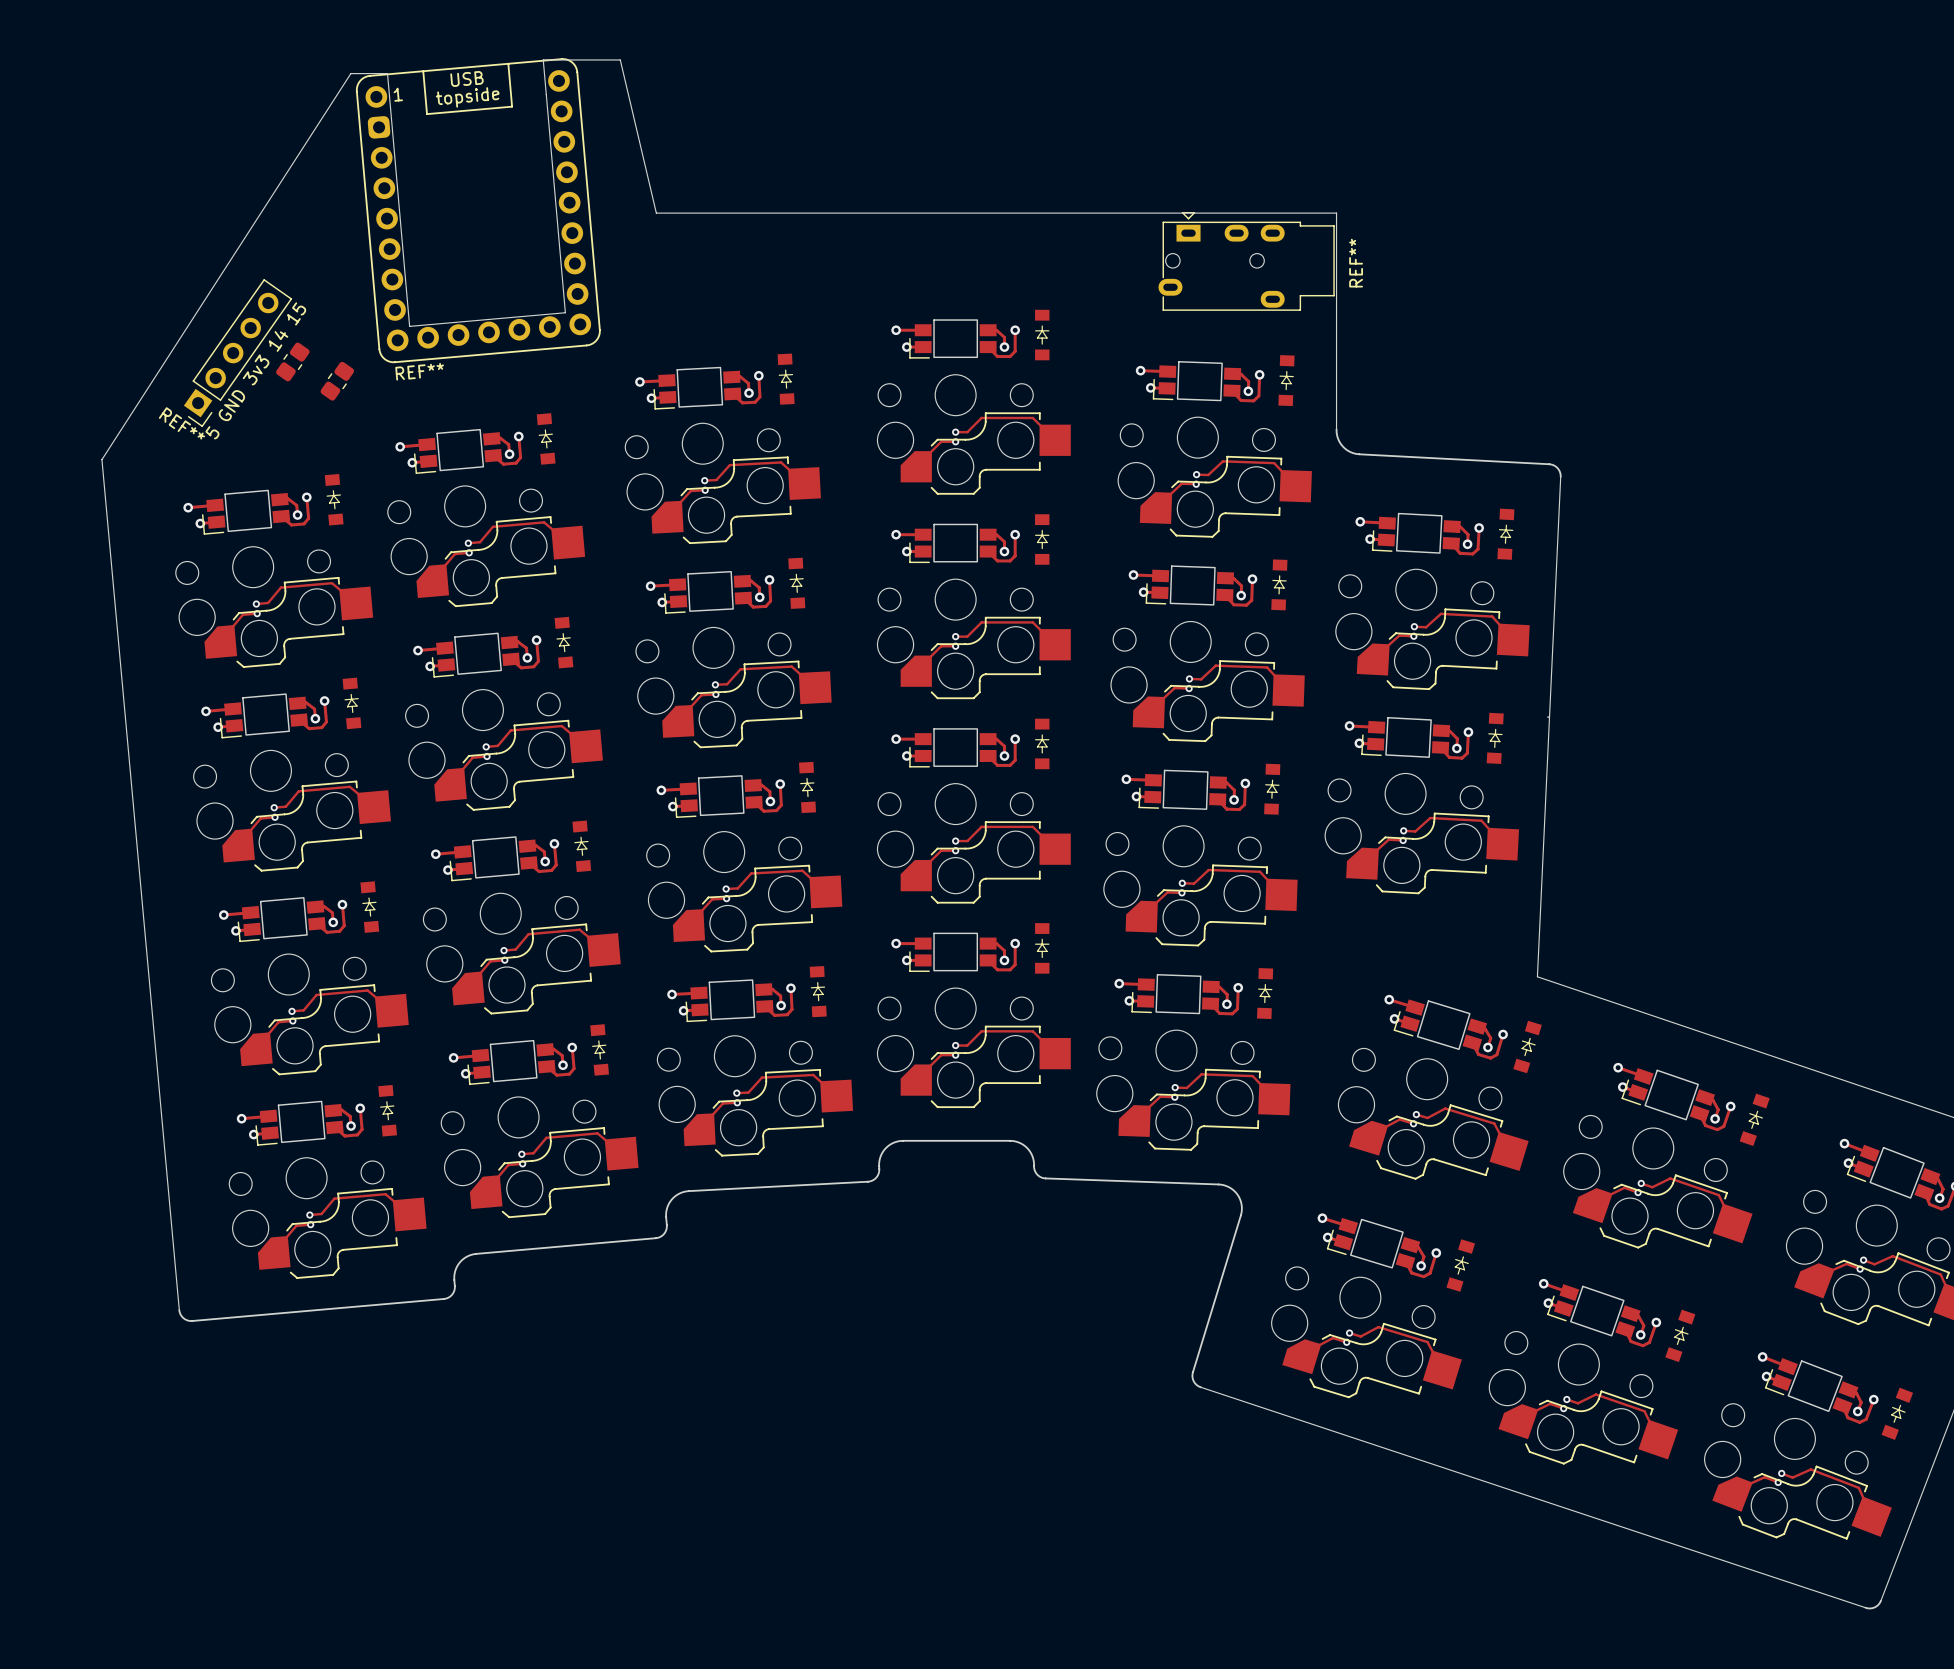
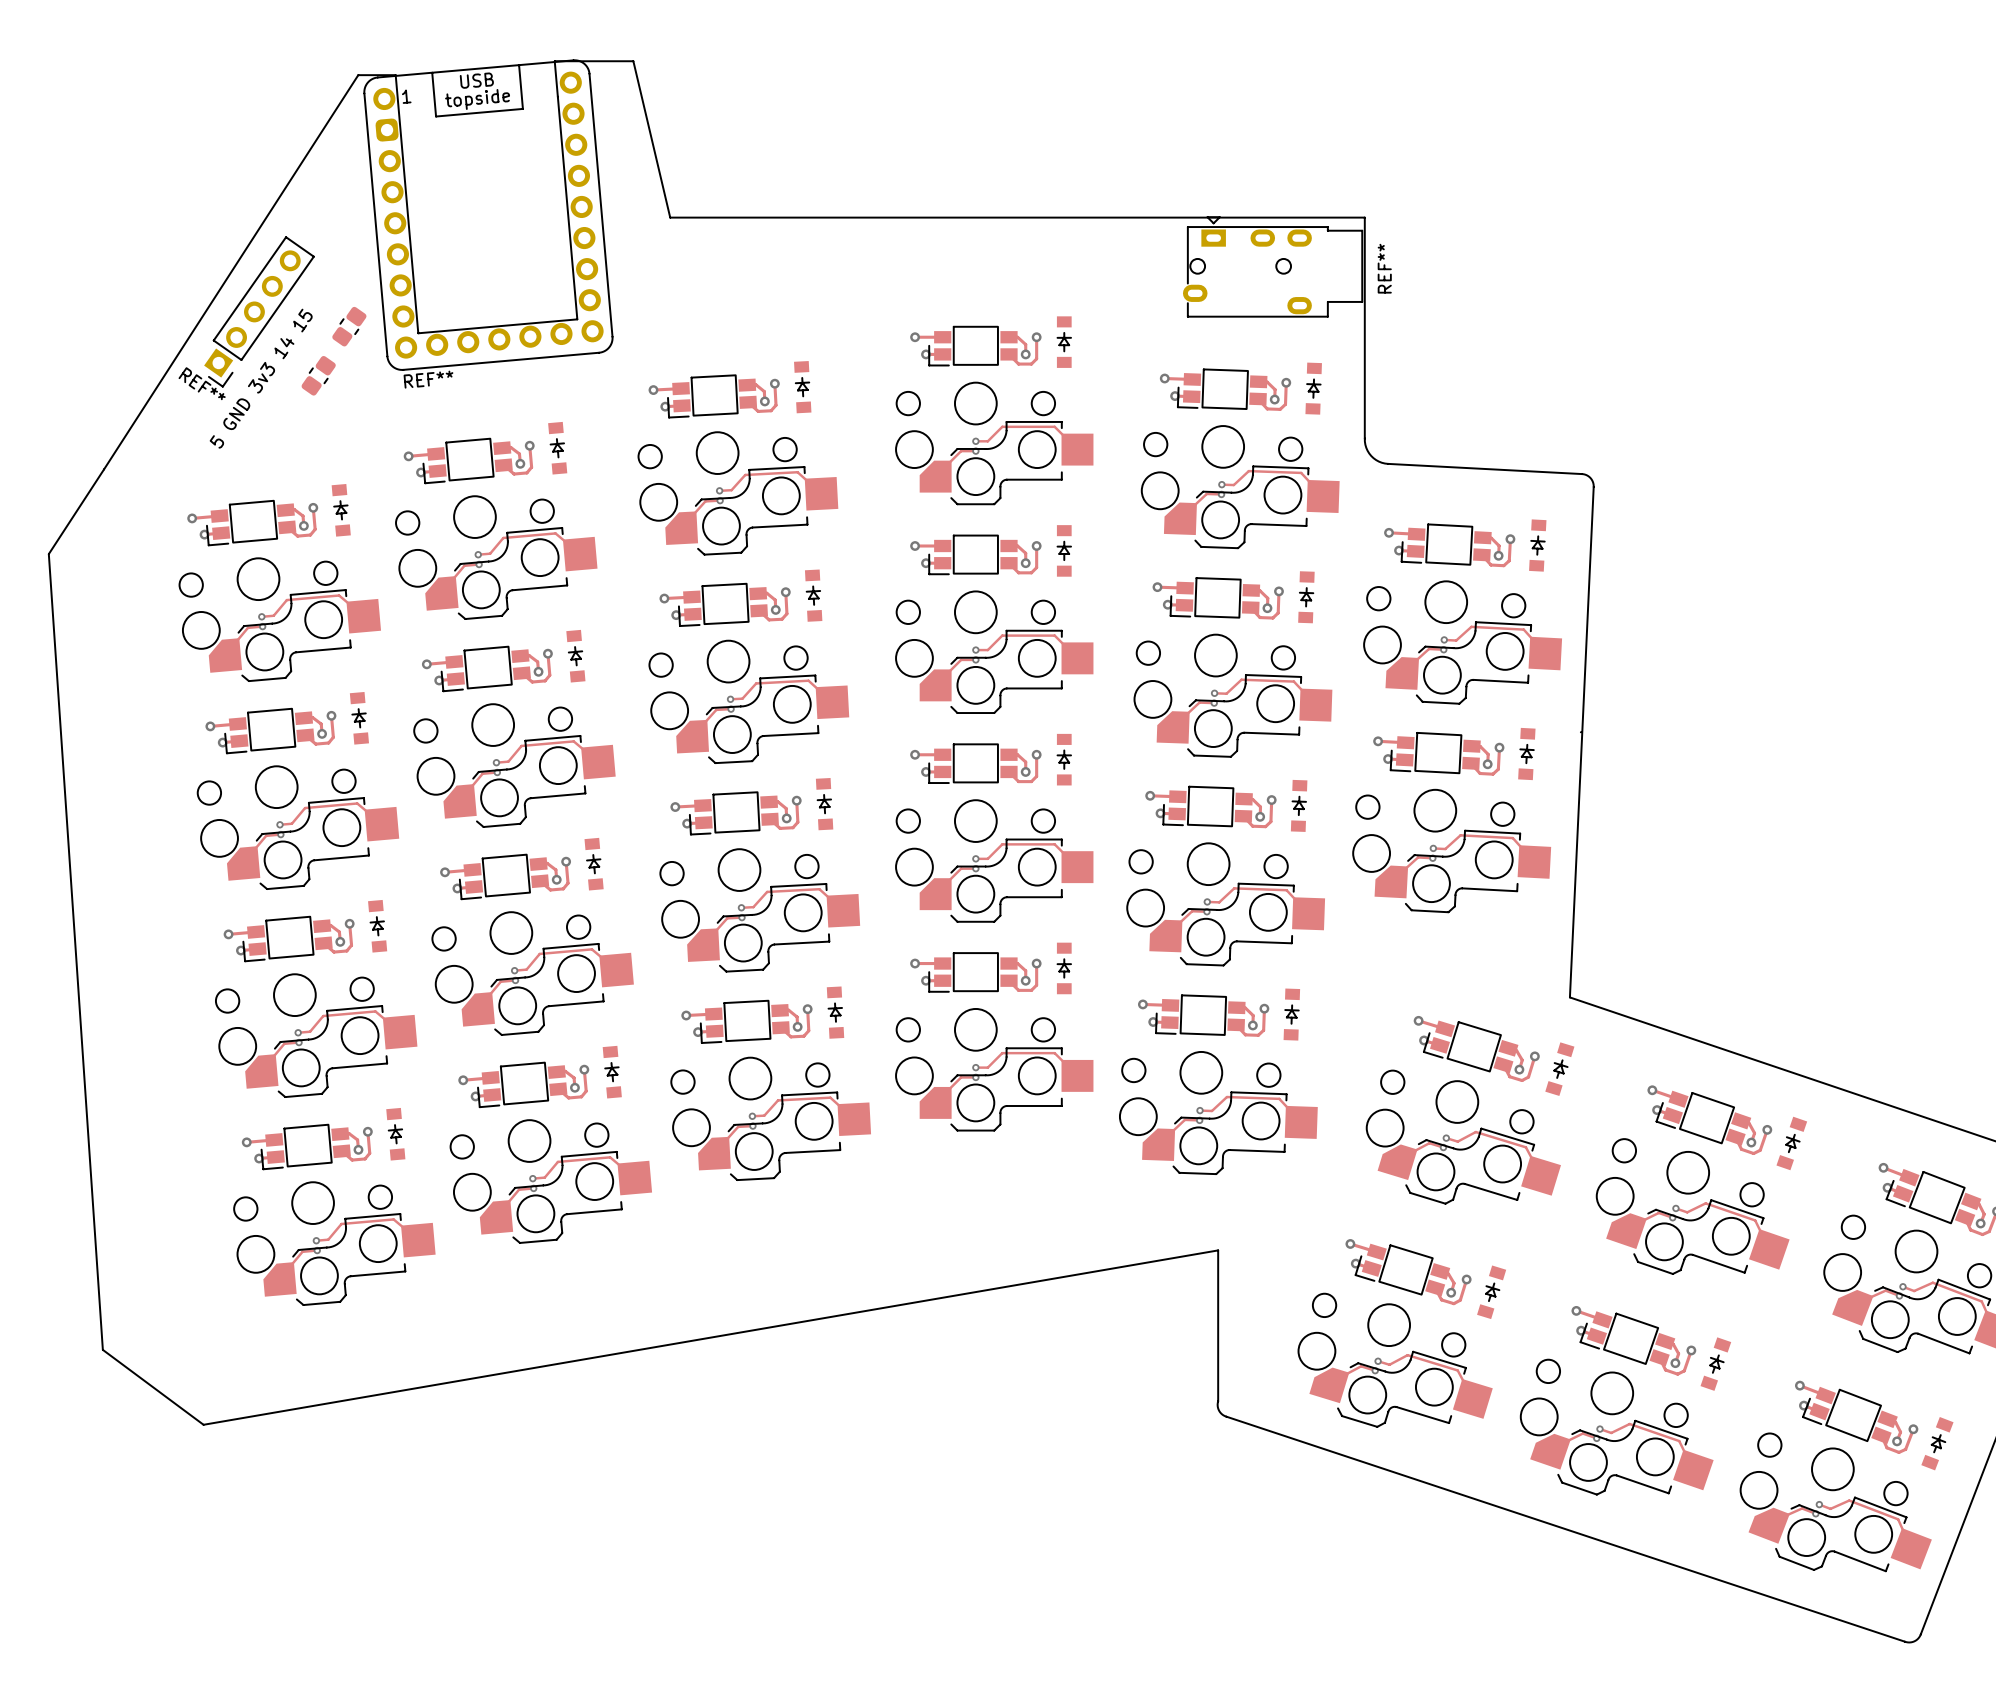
part: none -> (349, 326)
REF** position: (237, 353) -> (259, 311)
part: (292, 361) -> none
part: none -> (318, 375)
part: (337, 381) -> none
board edge: (101, 459) (179, 1310) (183, 1318) (192, 1320) (445, 1298) (451, 1295) (454, 1290) (454, 1274) (456, 1266) (463, 1258) (470, 1254) (660, 1236) (666, 1229) (666, 1211) (668, 1203) (676, 1195) (683, 1192) (869, 1181) (877, 1175) (879, 1160) (883, 1150) (897, 1141) (1010, 1140) (1020, 1143) (1027, 1148) (1032, 1157) (1035, 1172) (1042, 1178) (1218, 1184) (1229, 1187) (1237, 1194) (1241, 1204) (1240, 1215) (1192, 1372) -> (104, 469) (48, 554) (102, 1349) (203, 1424) (1218, 1250) (1218, 1401)

